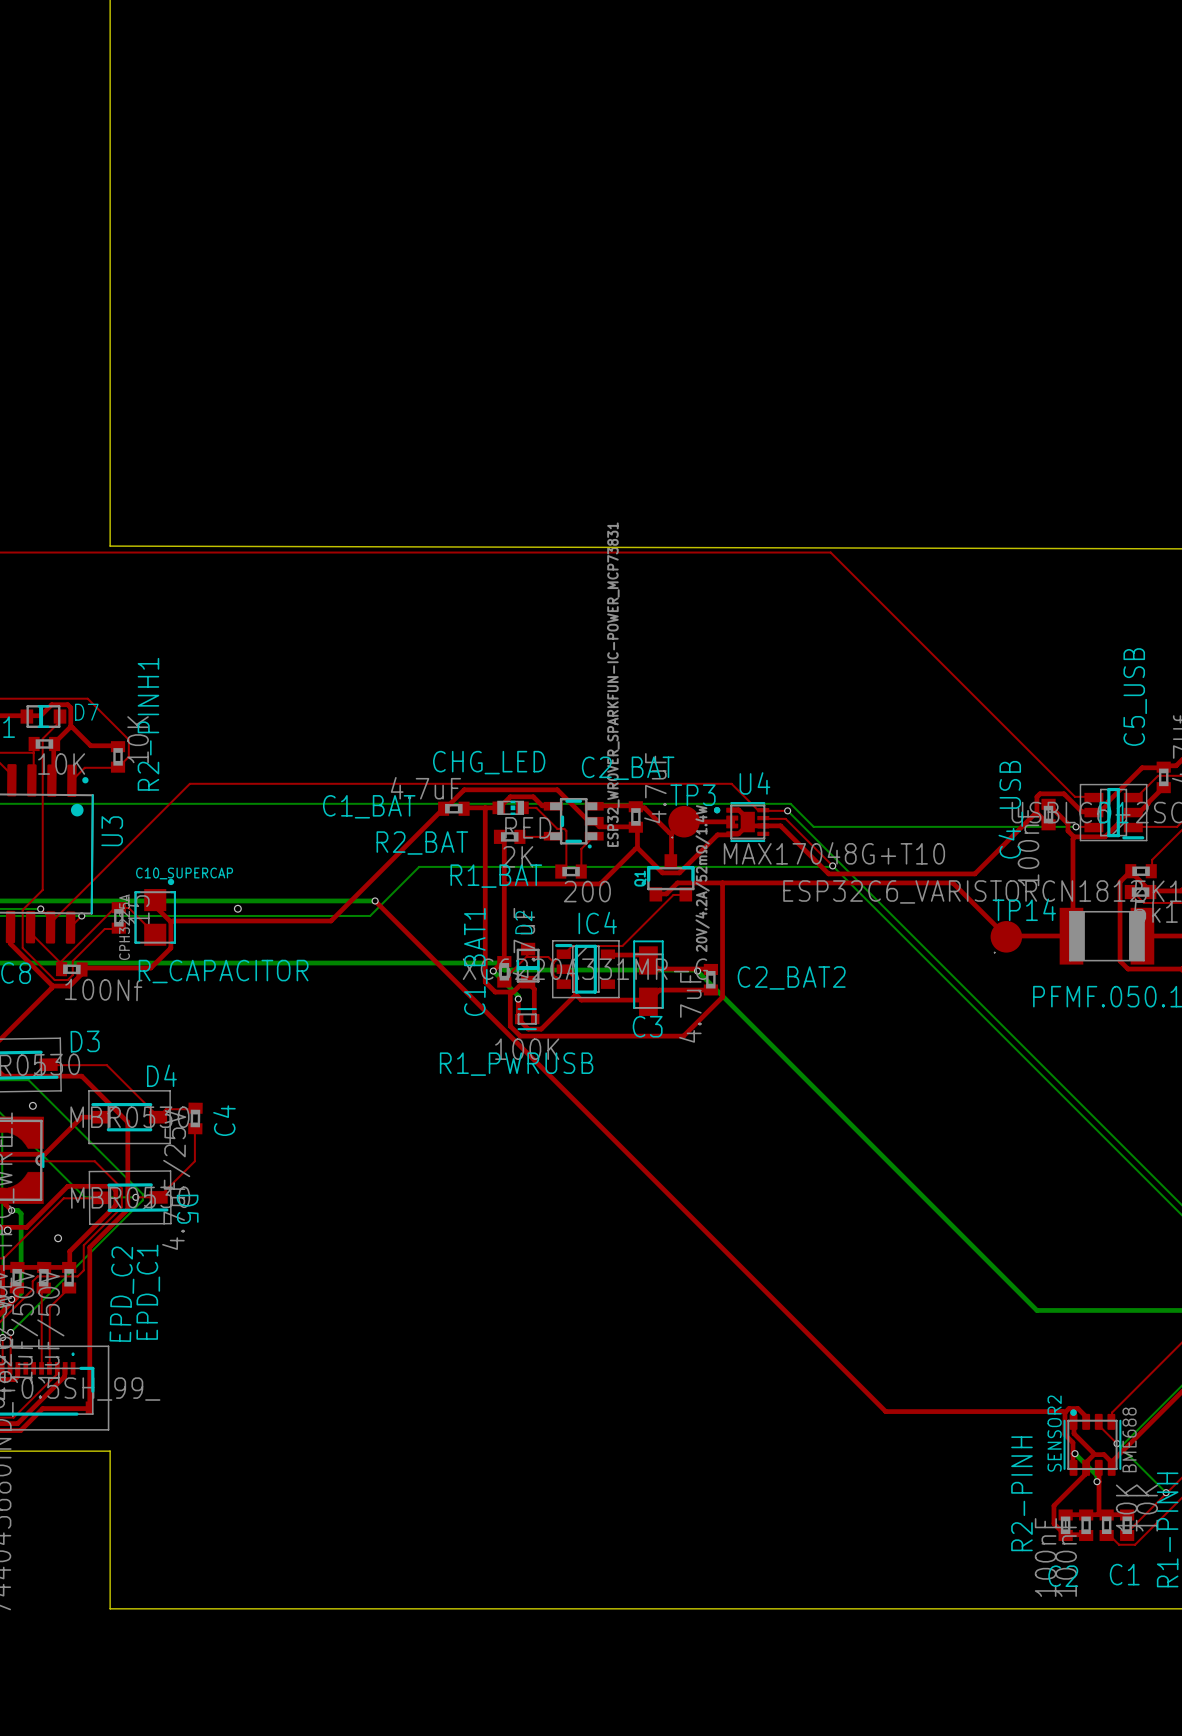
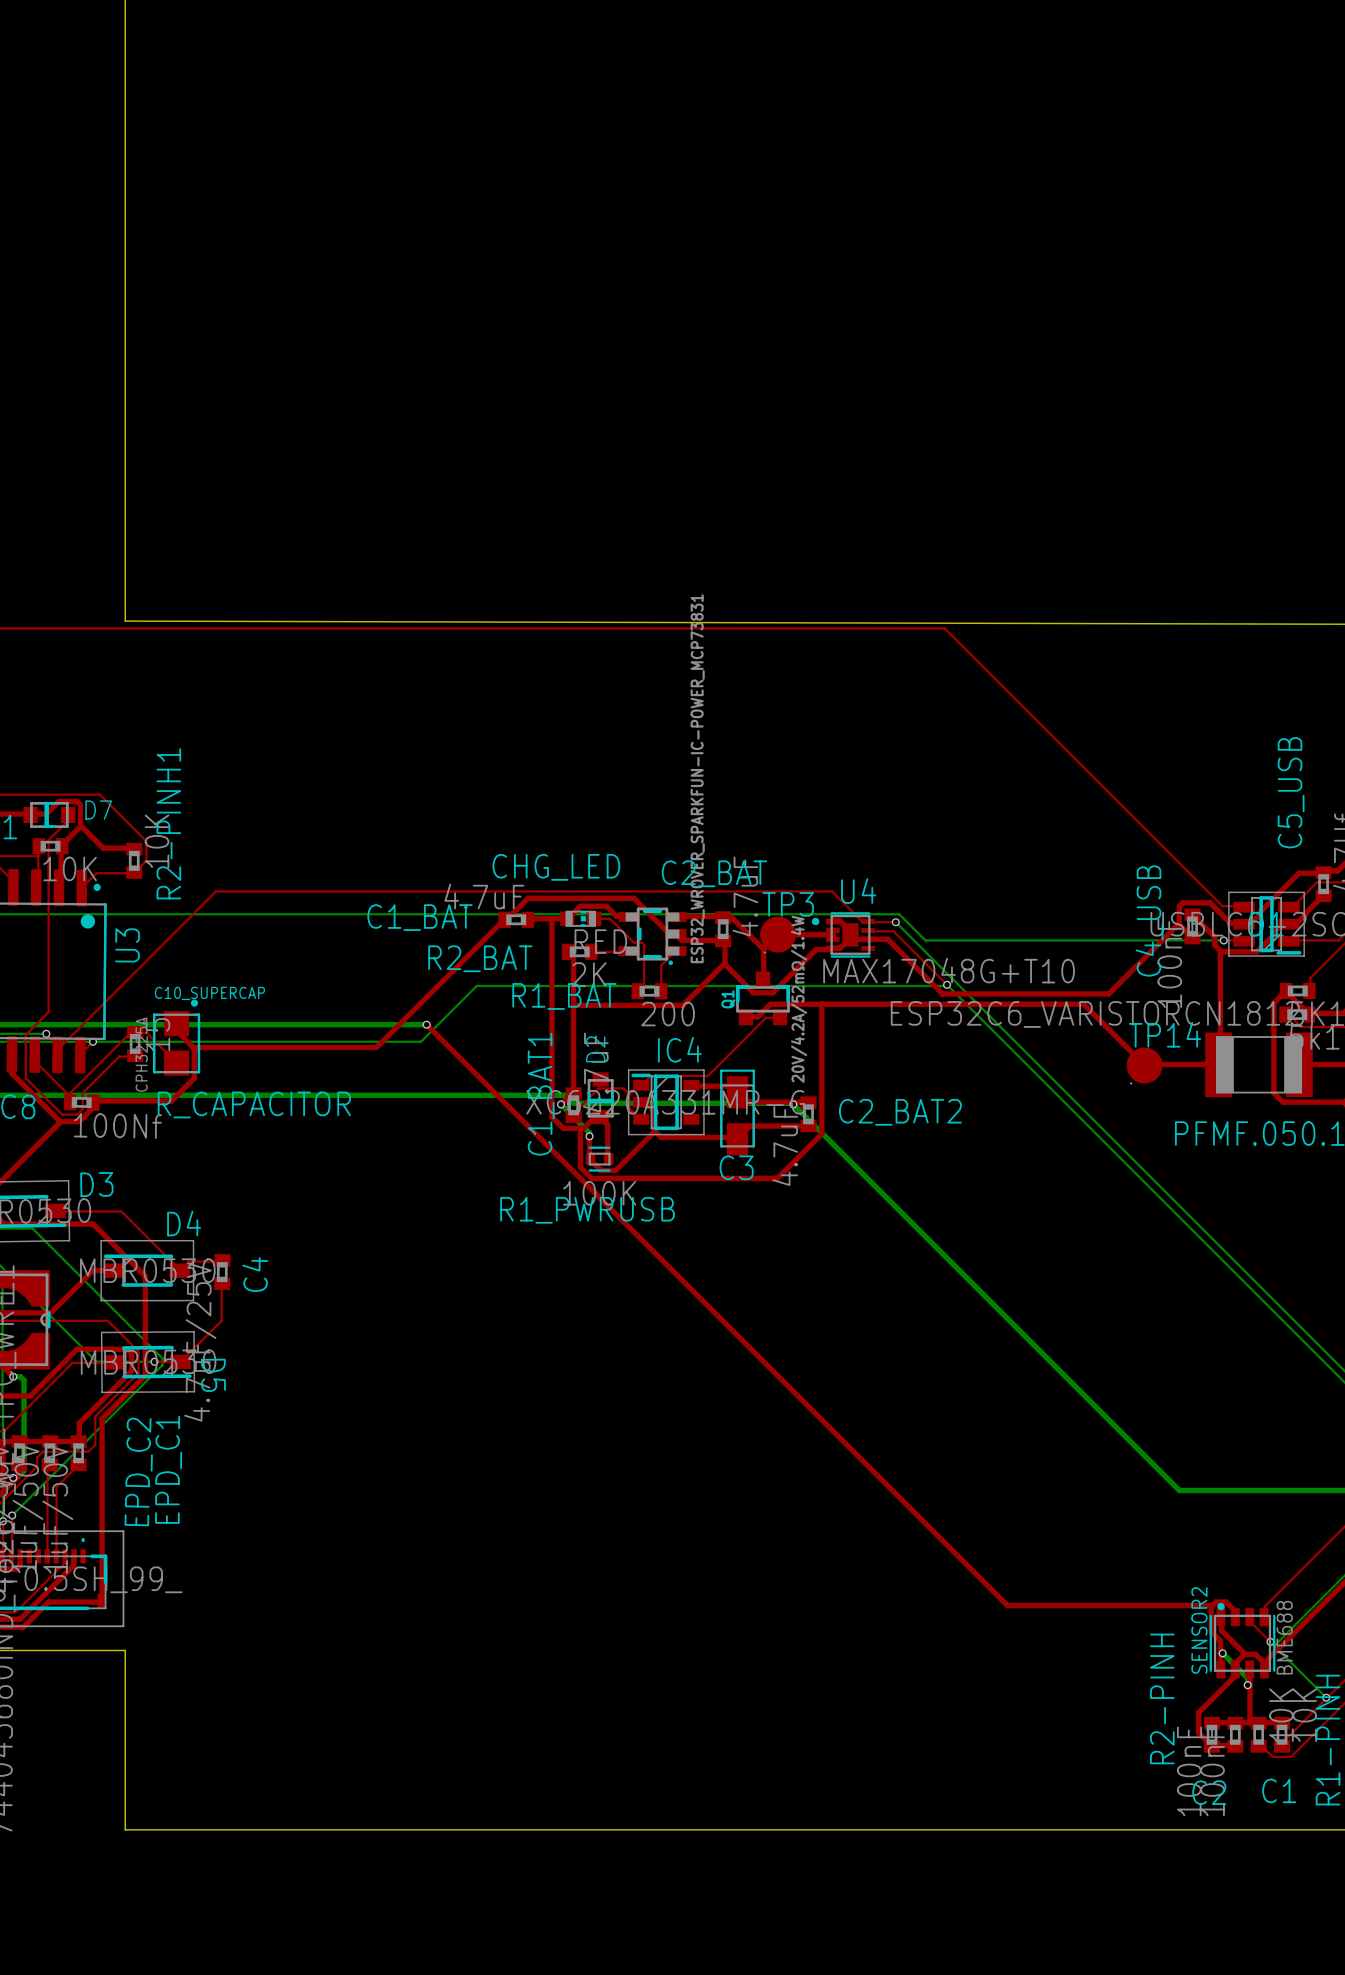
via: (237, 908) -> none
via: (32, 1105) -> none
via: (7, 1230) -> none
via: (58, 1238) -> none

